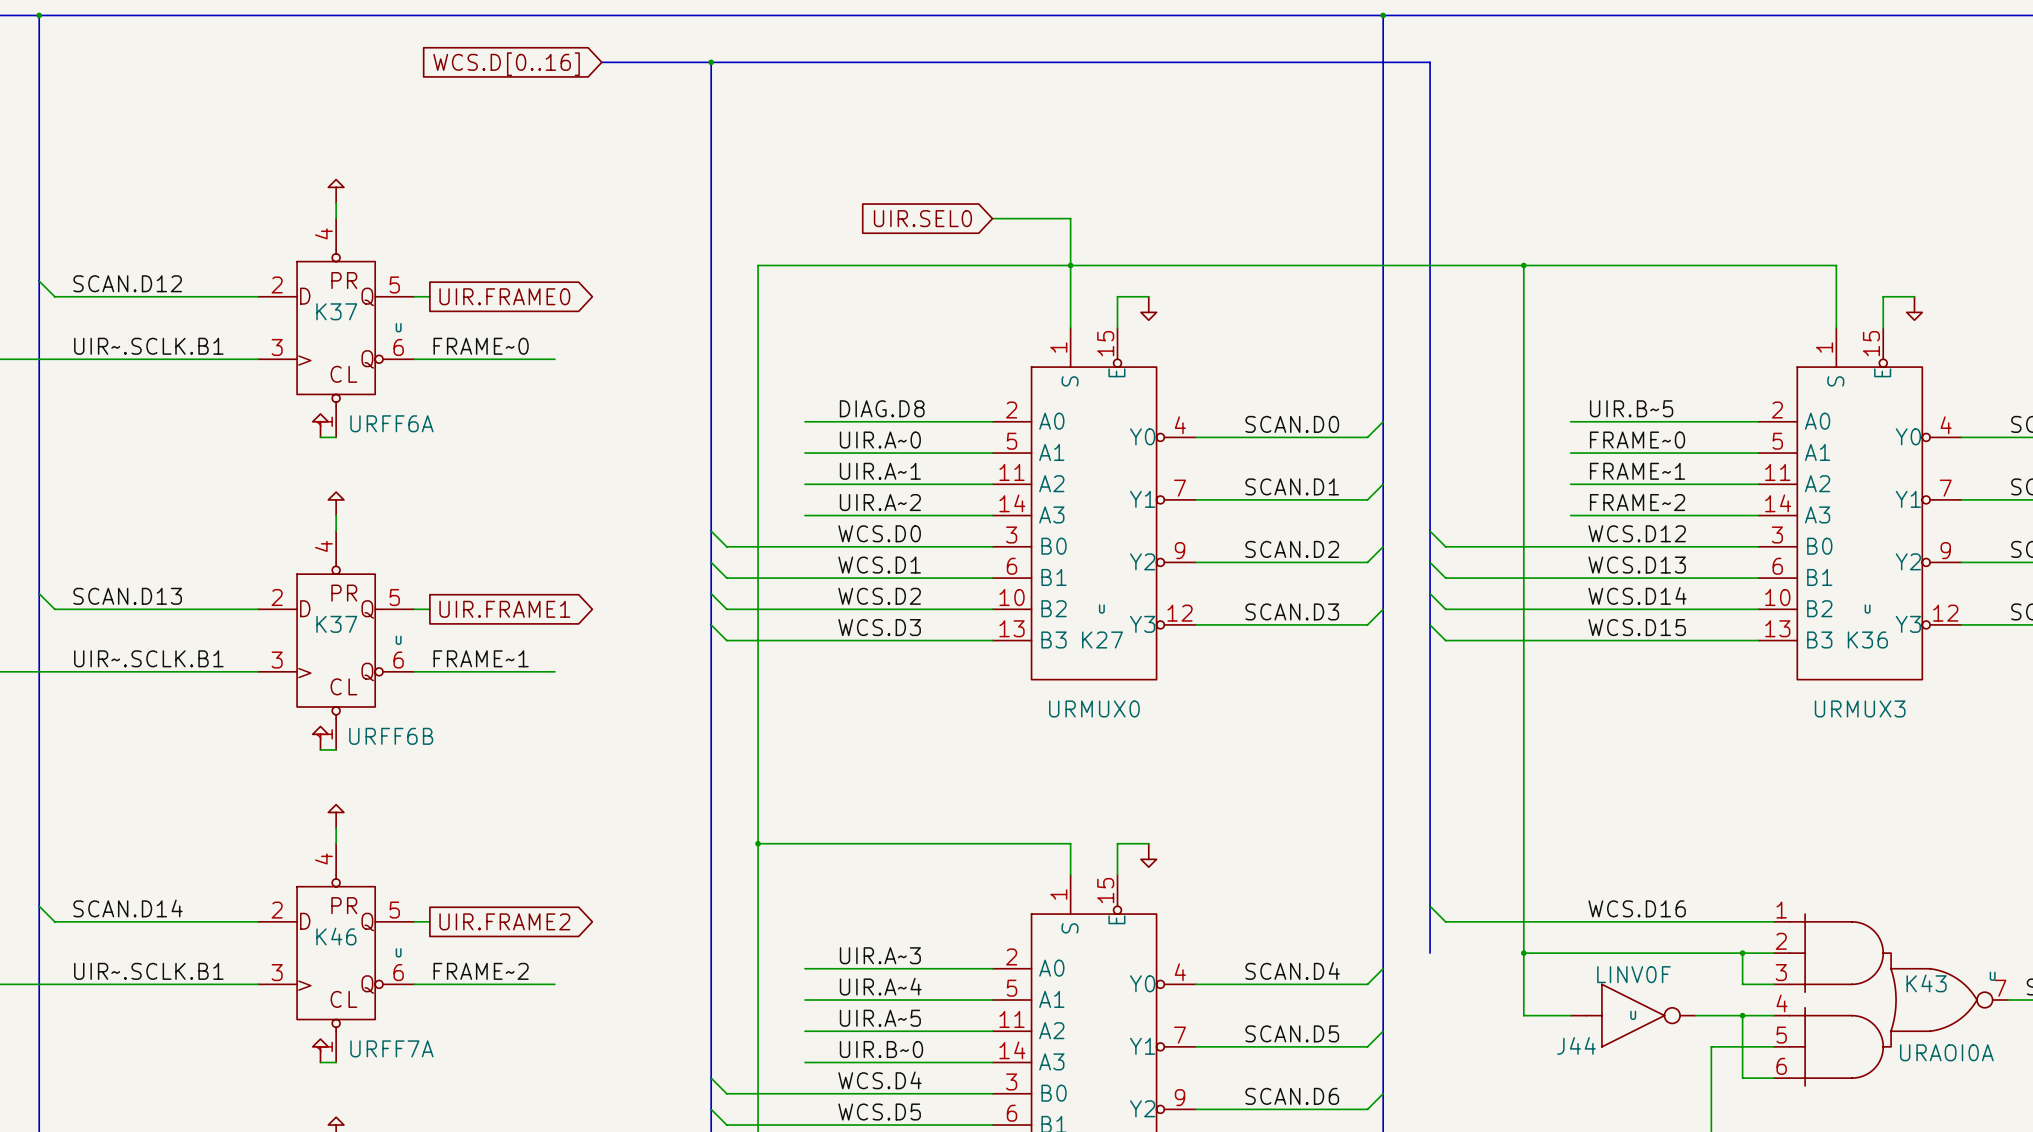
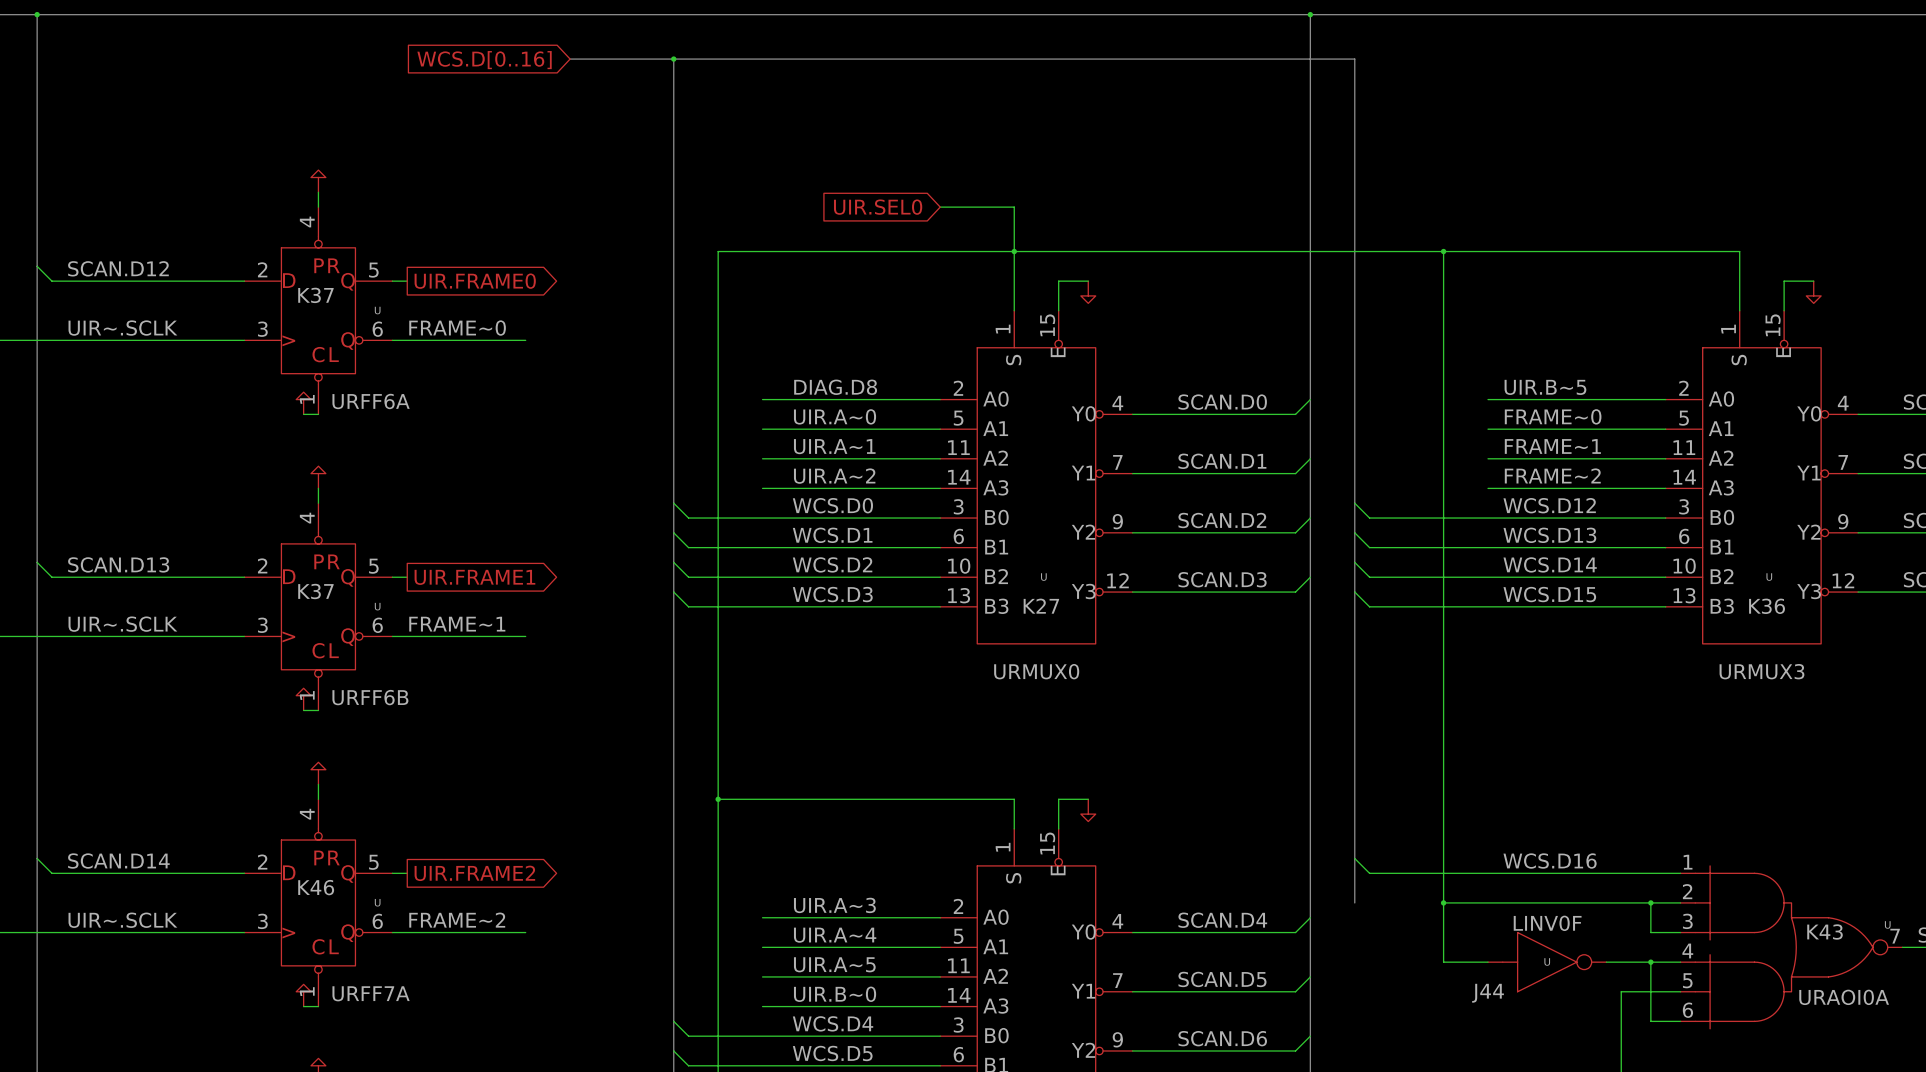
label: UIR~.SCLK.B1 (148, 346) -> UIR~.SCLK (122, 328)
label: UIR~.SCLK.B1 (148, 658) -> UIR~.SCLK (122, 624)
label: UIR~.SCLK.B1 (148, 971) -> UIR~.SCLK (122, 920)

